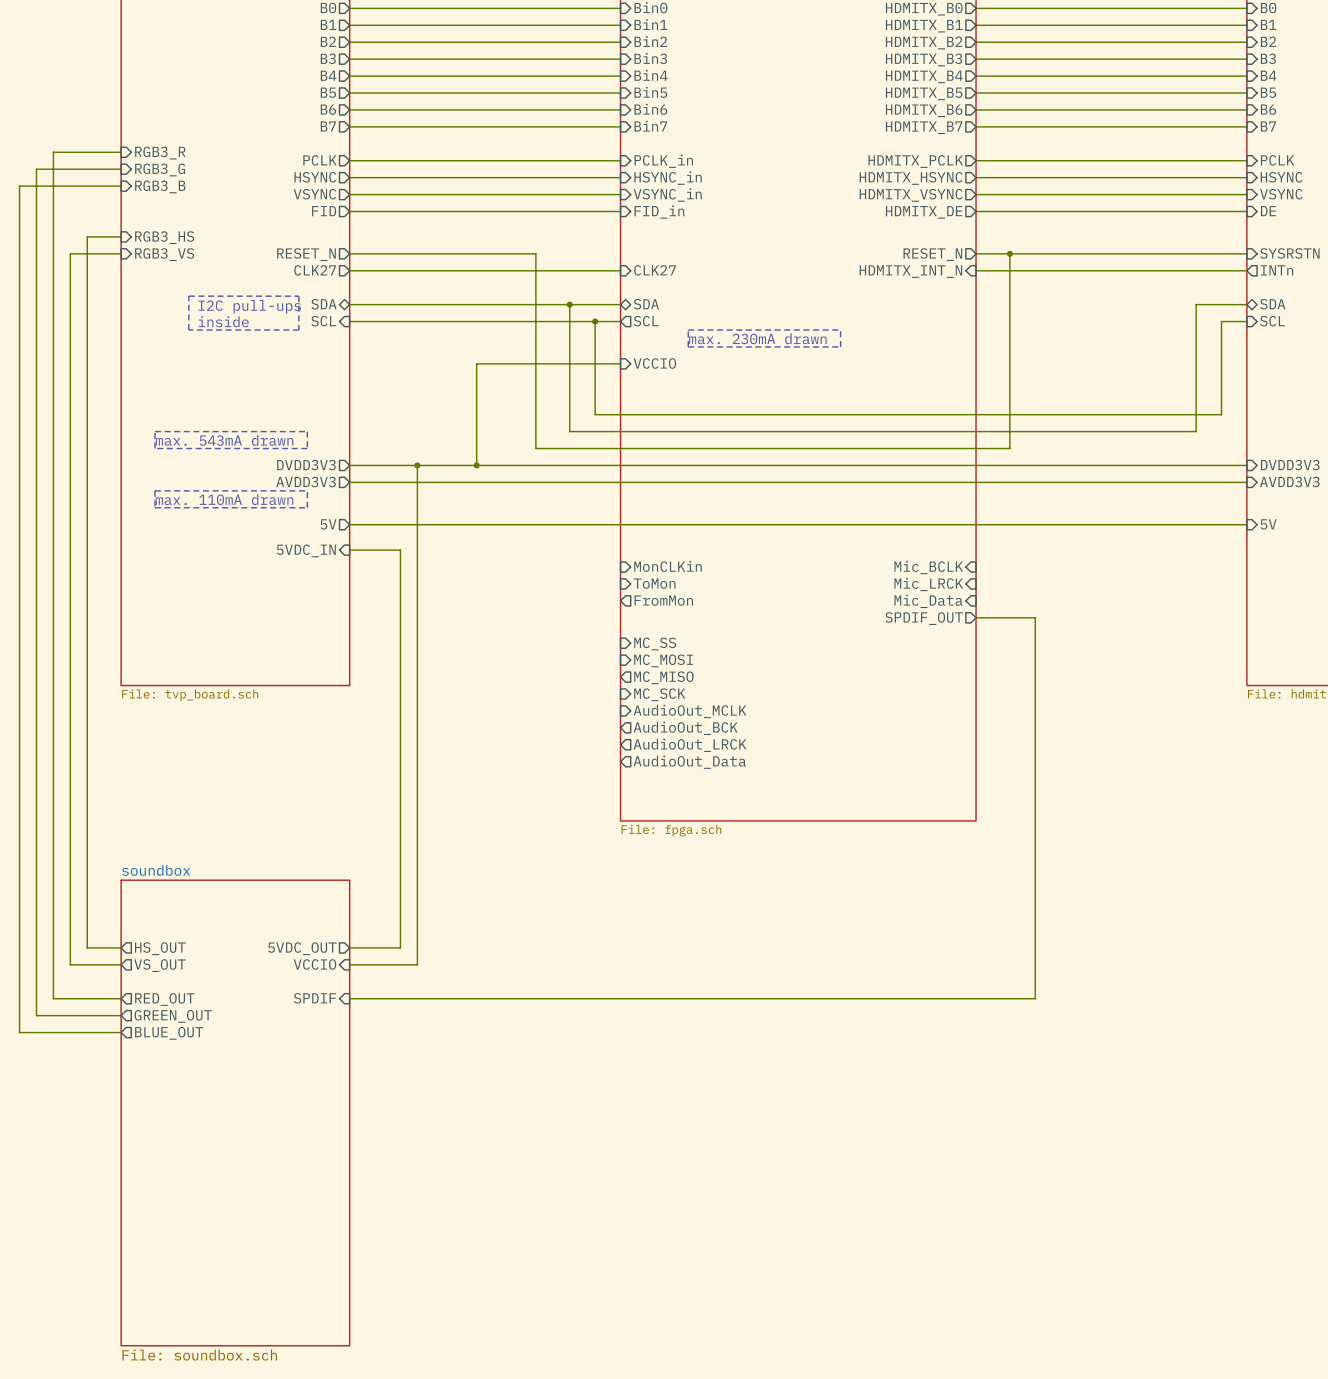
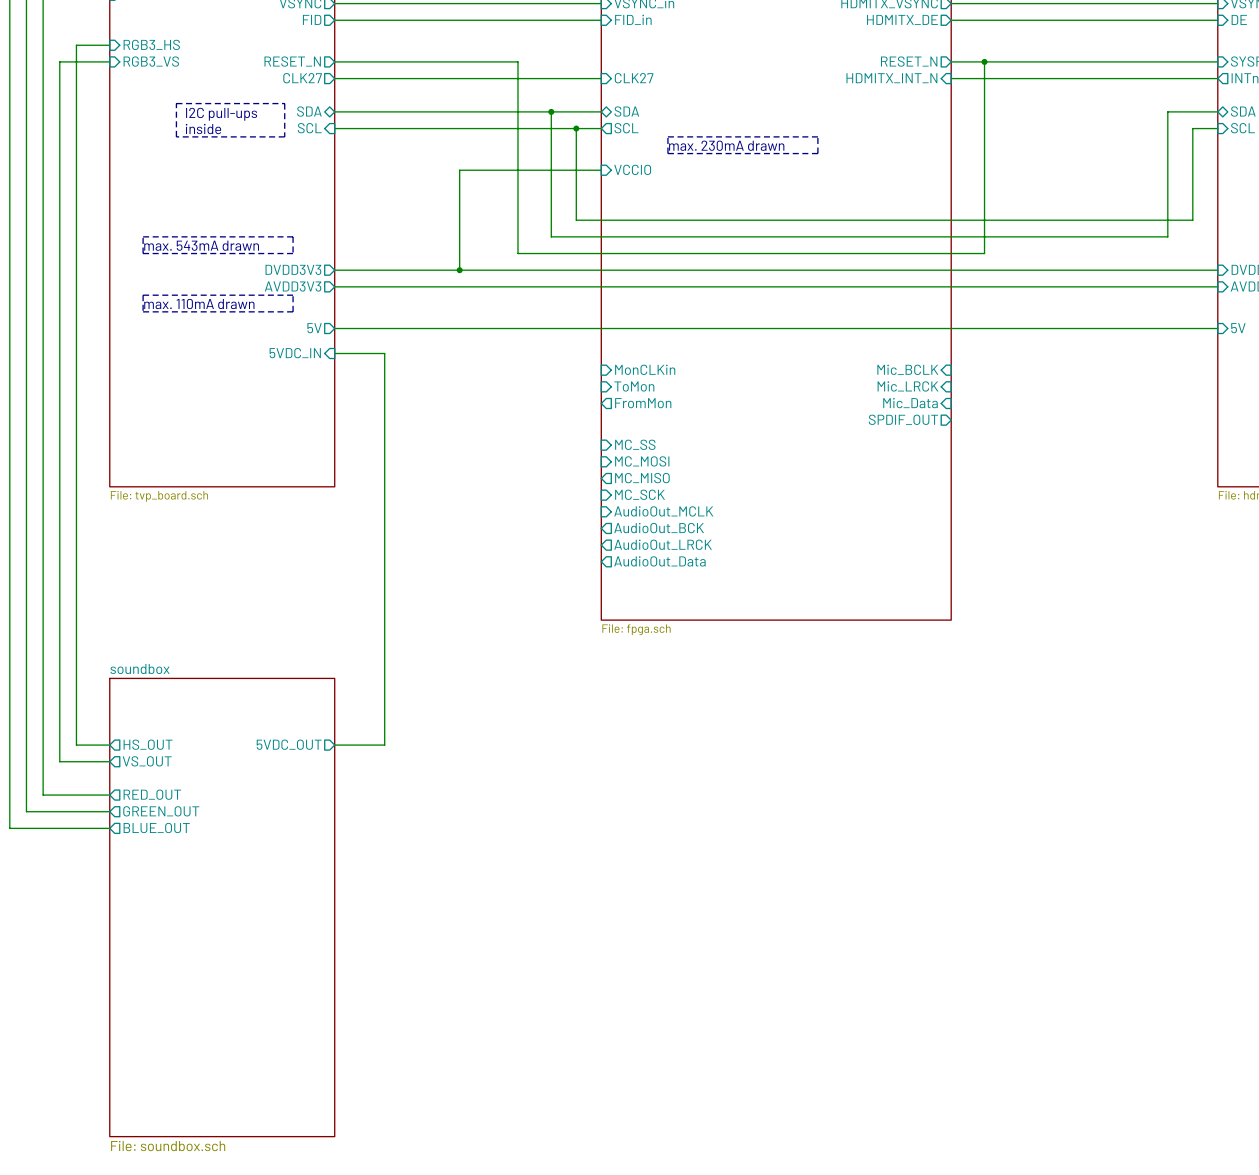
wire: (417, 465) (417, 964) (349, 964) -> none
junction: (417, 465) -> none
wire: (976, 617) (1035, 617) (1035, 998) (349, 998) -> none
sheet pin: VCCIO (314, 964) -> none
sheet pin: SPDIF (314, 998) -> none

